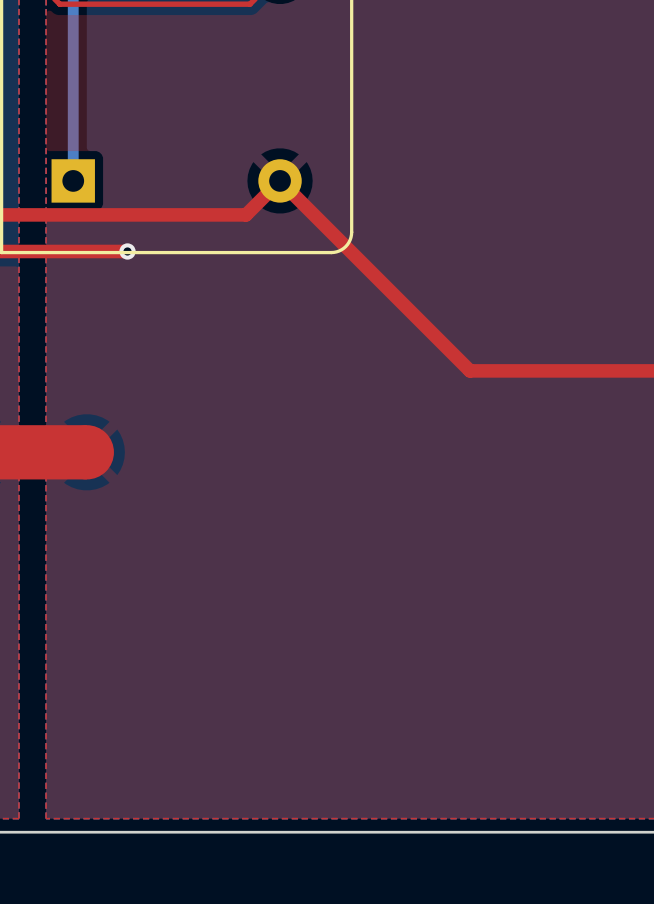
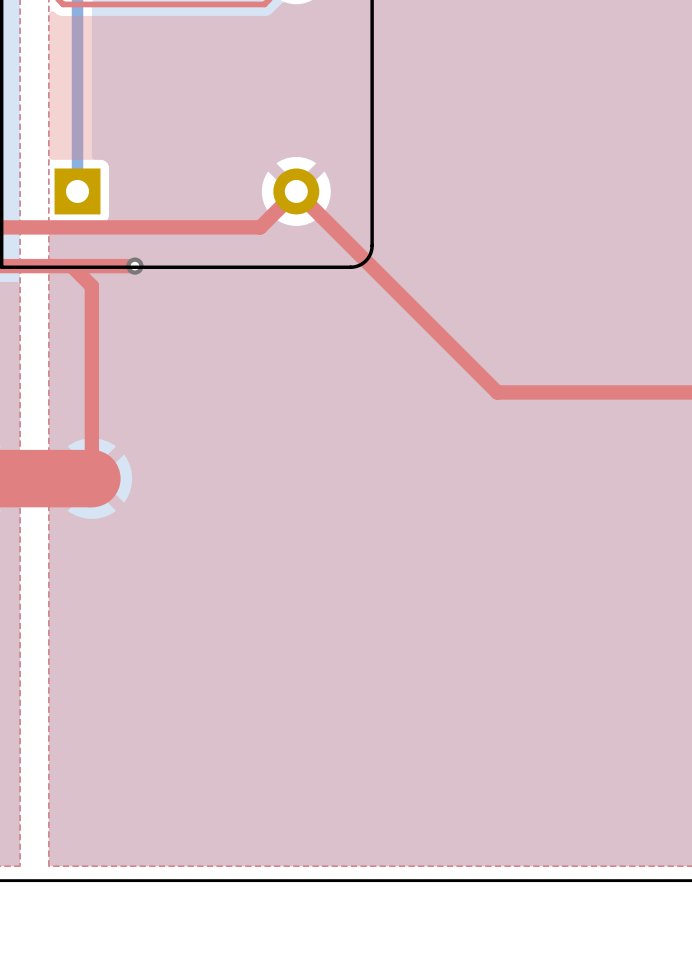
top track: none -> (71, 266) (91, 286) (91, 478)

